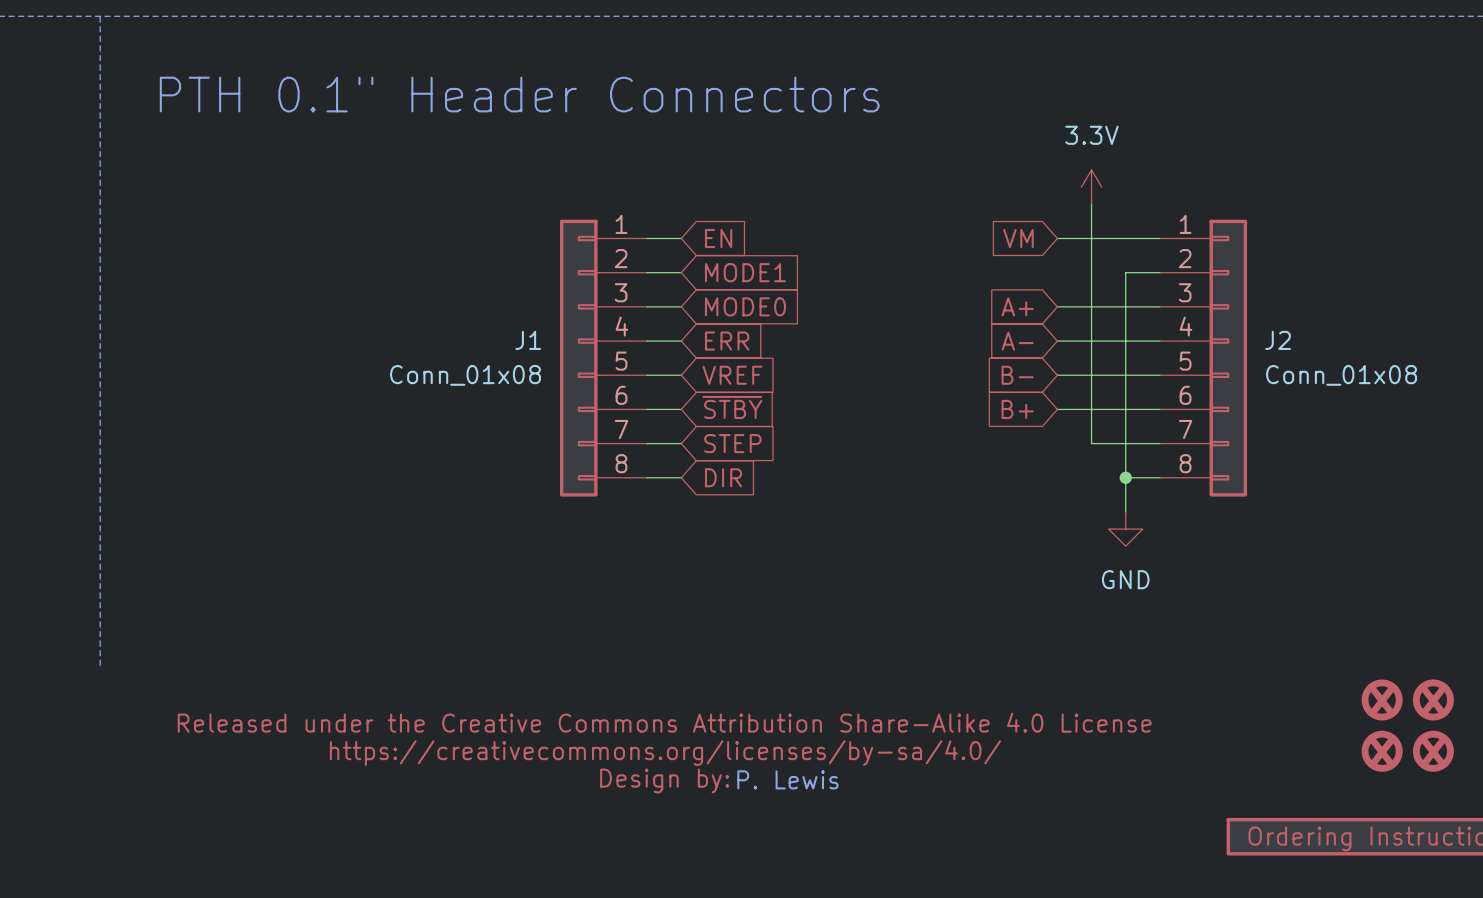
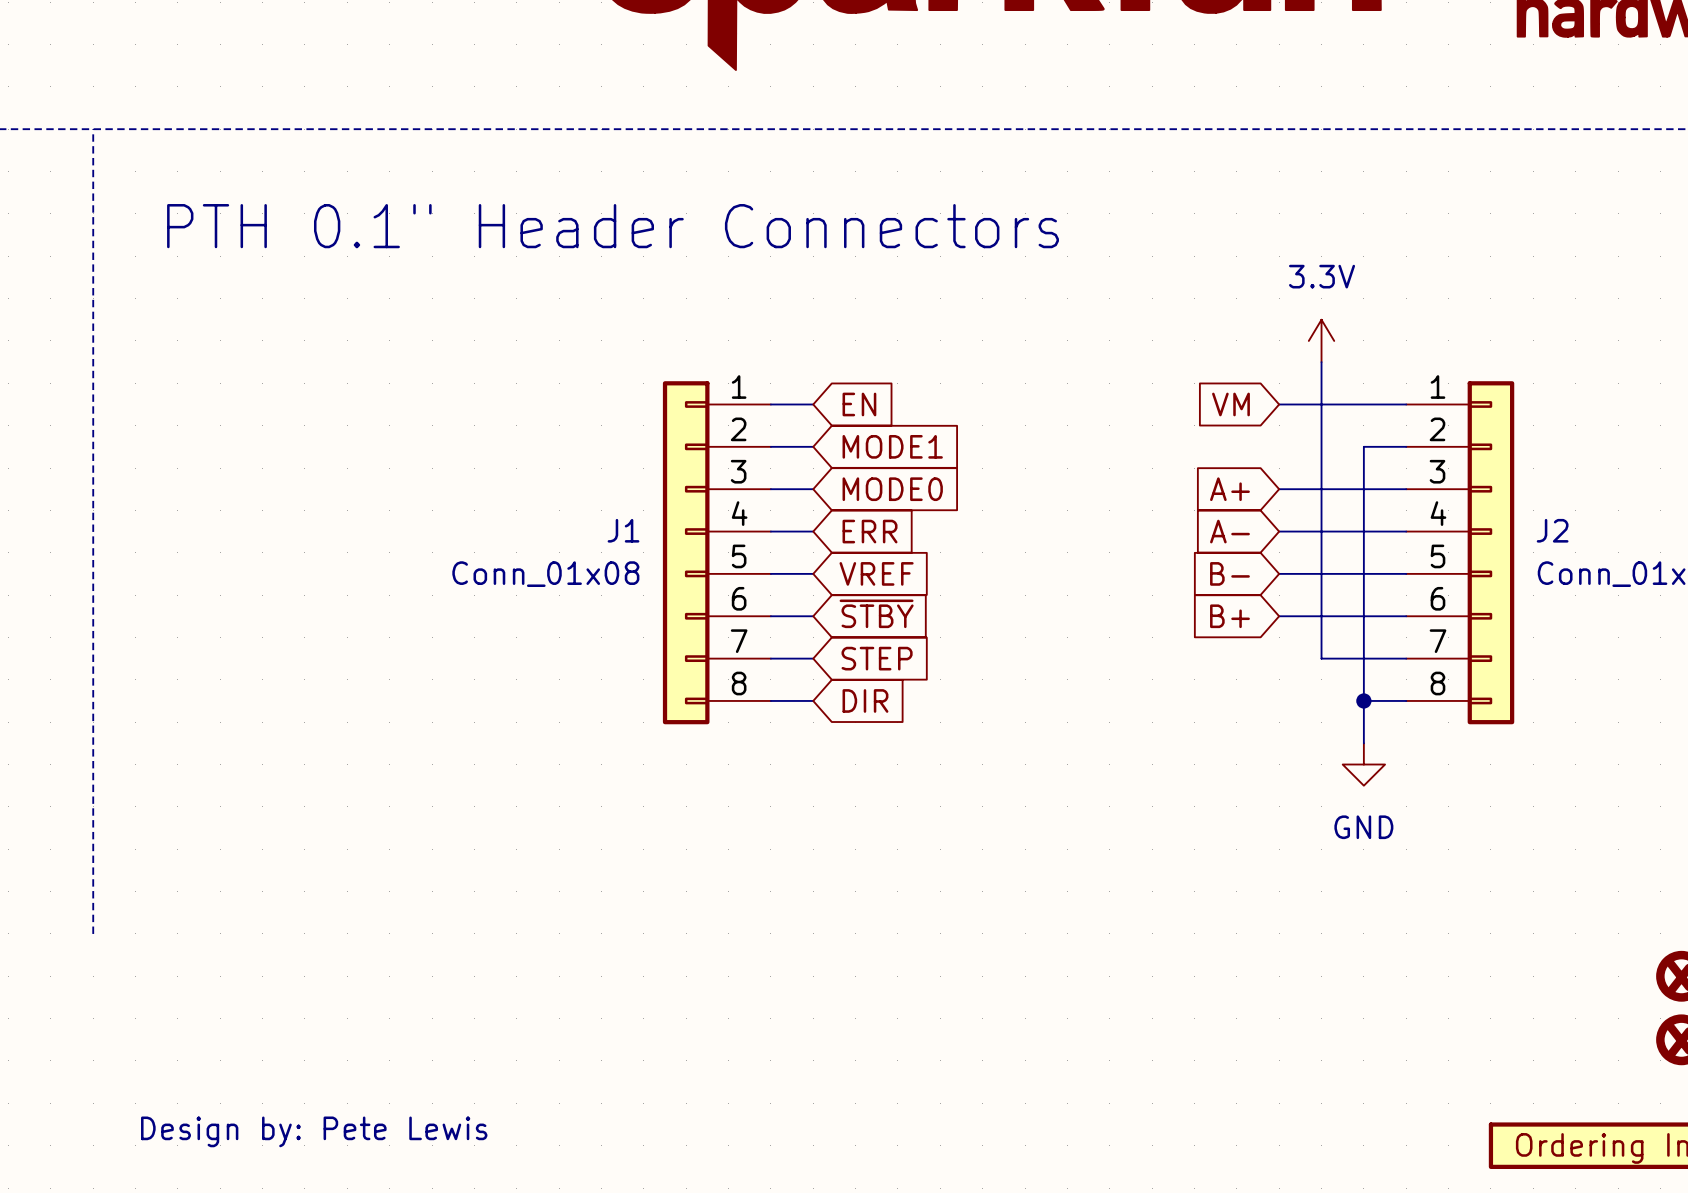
part: (664, 753) -> none
text: P. Lewis (787, 779) -> none
text: none -> Design by: Pete Lewis (314, 1131)

